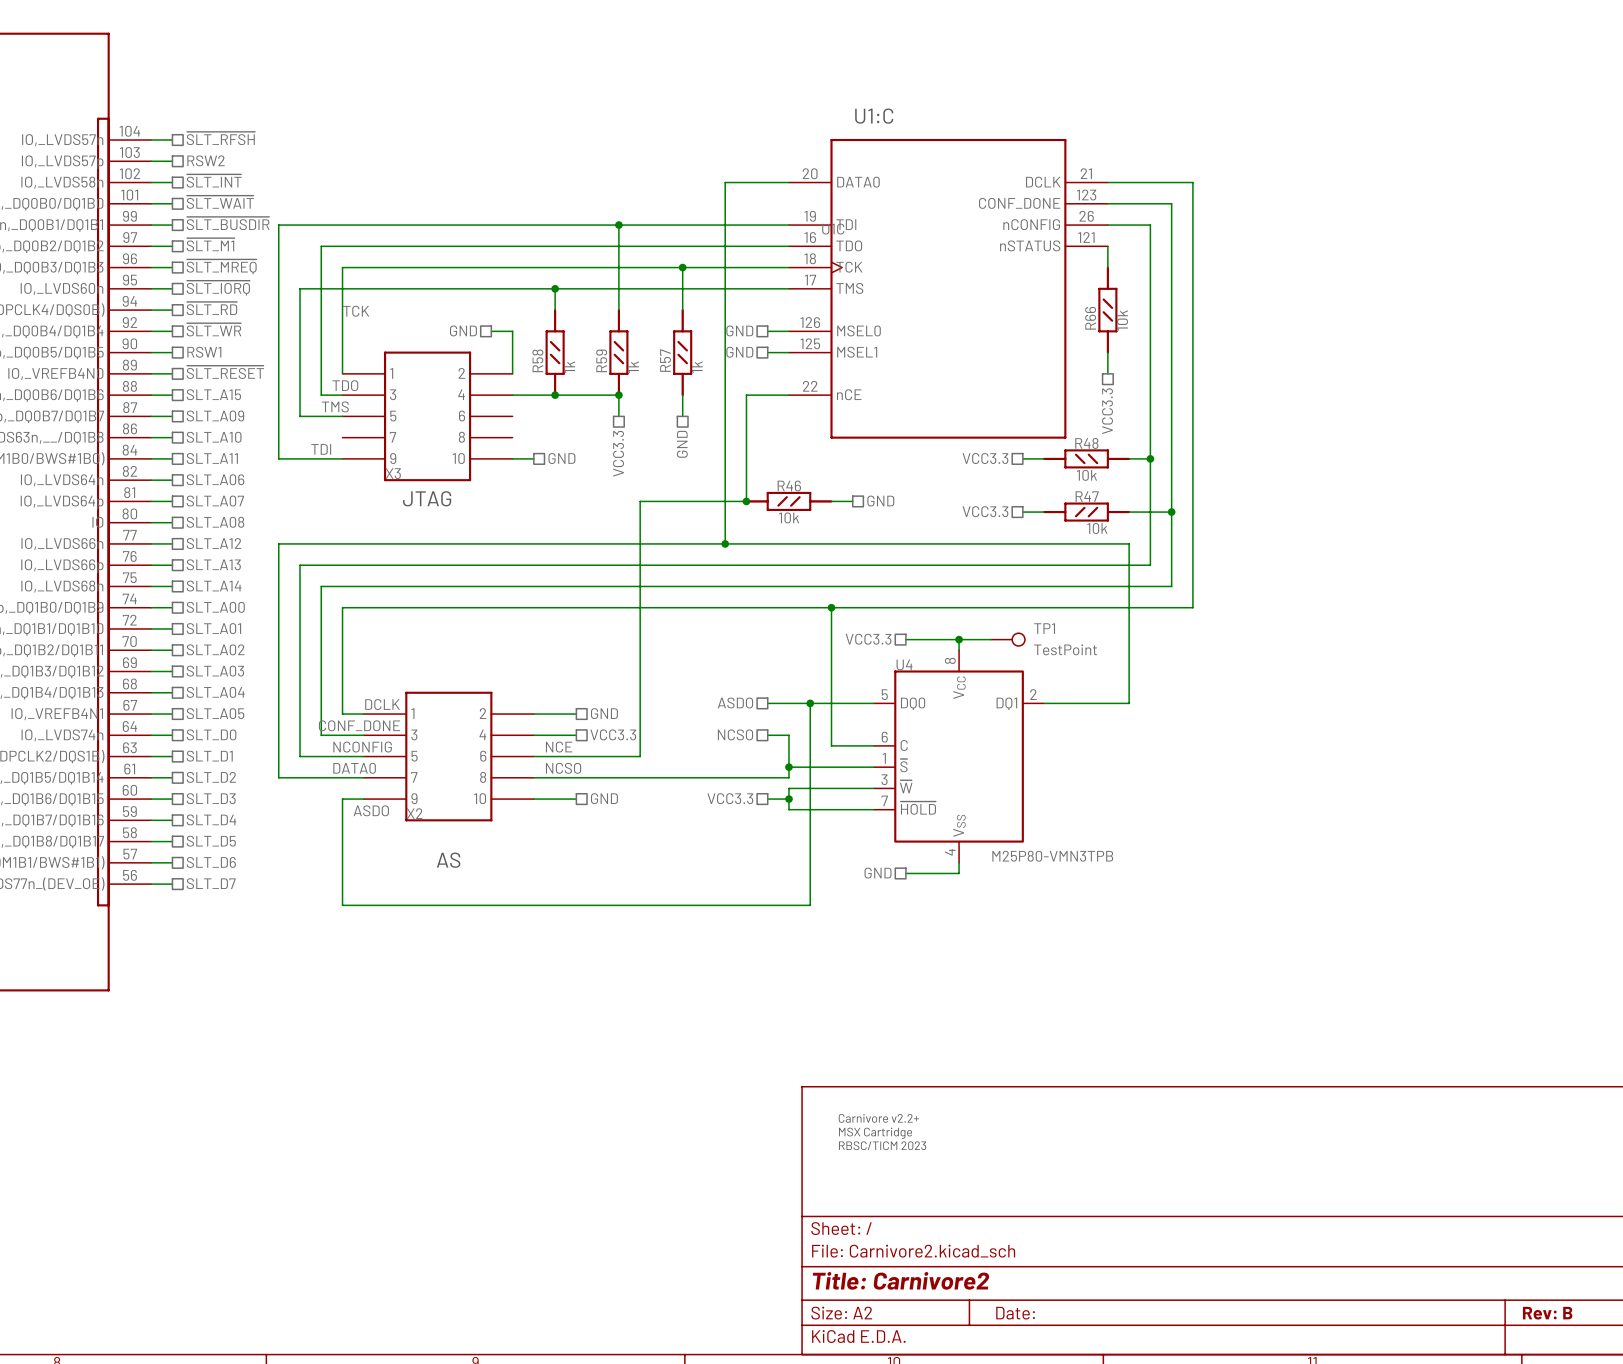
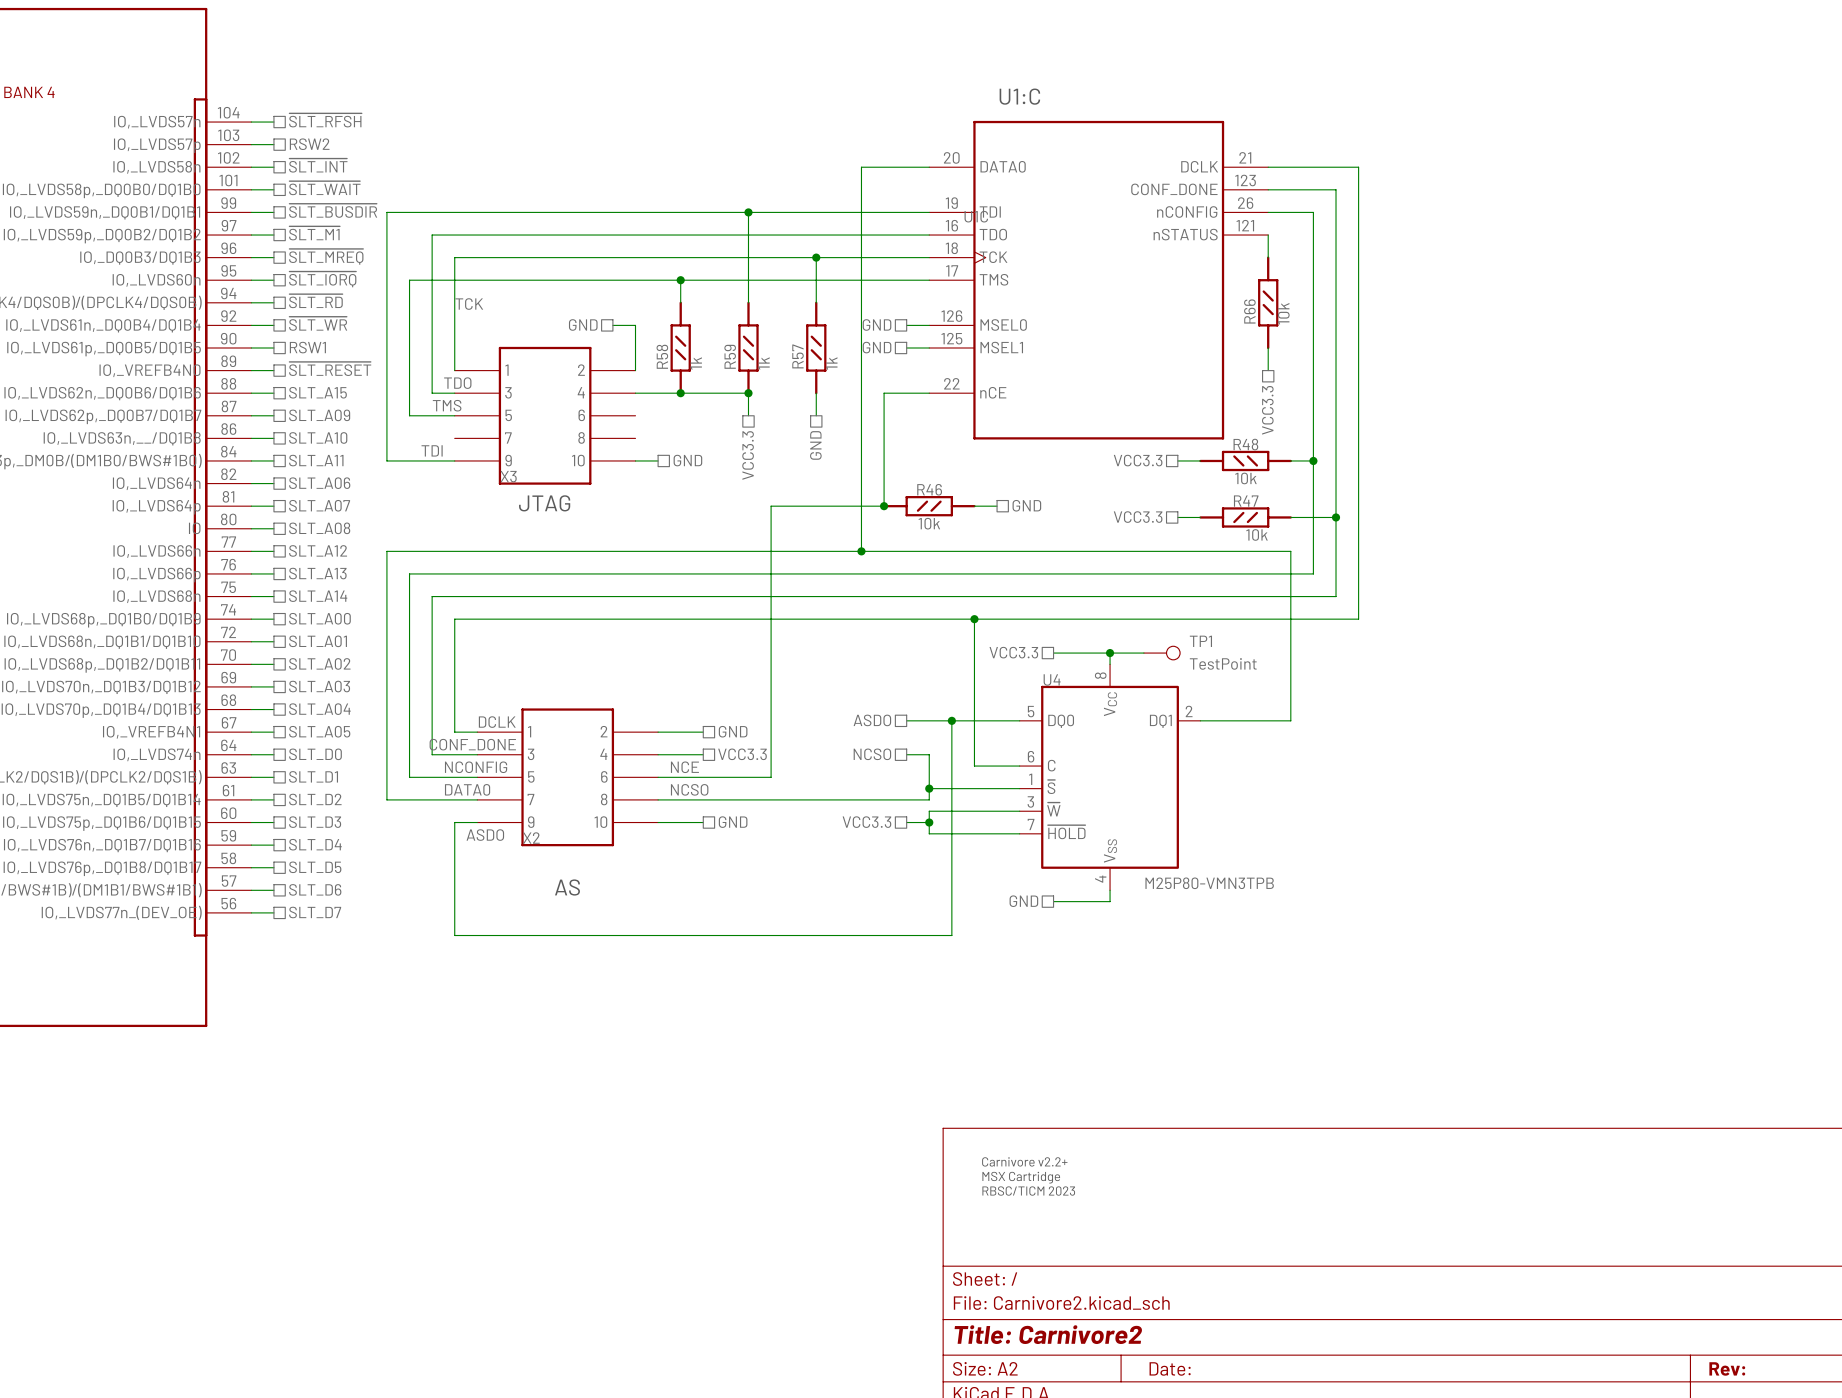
title block: Rev: B (1547, 1313) -> Rev: (1727, 1368)

